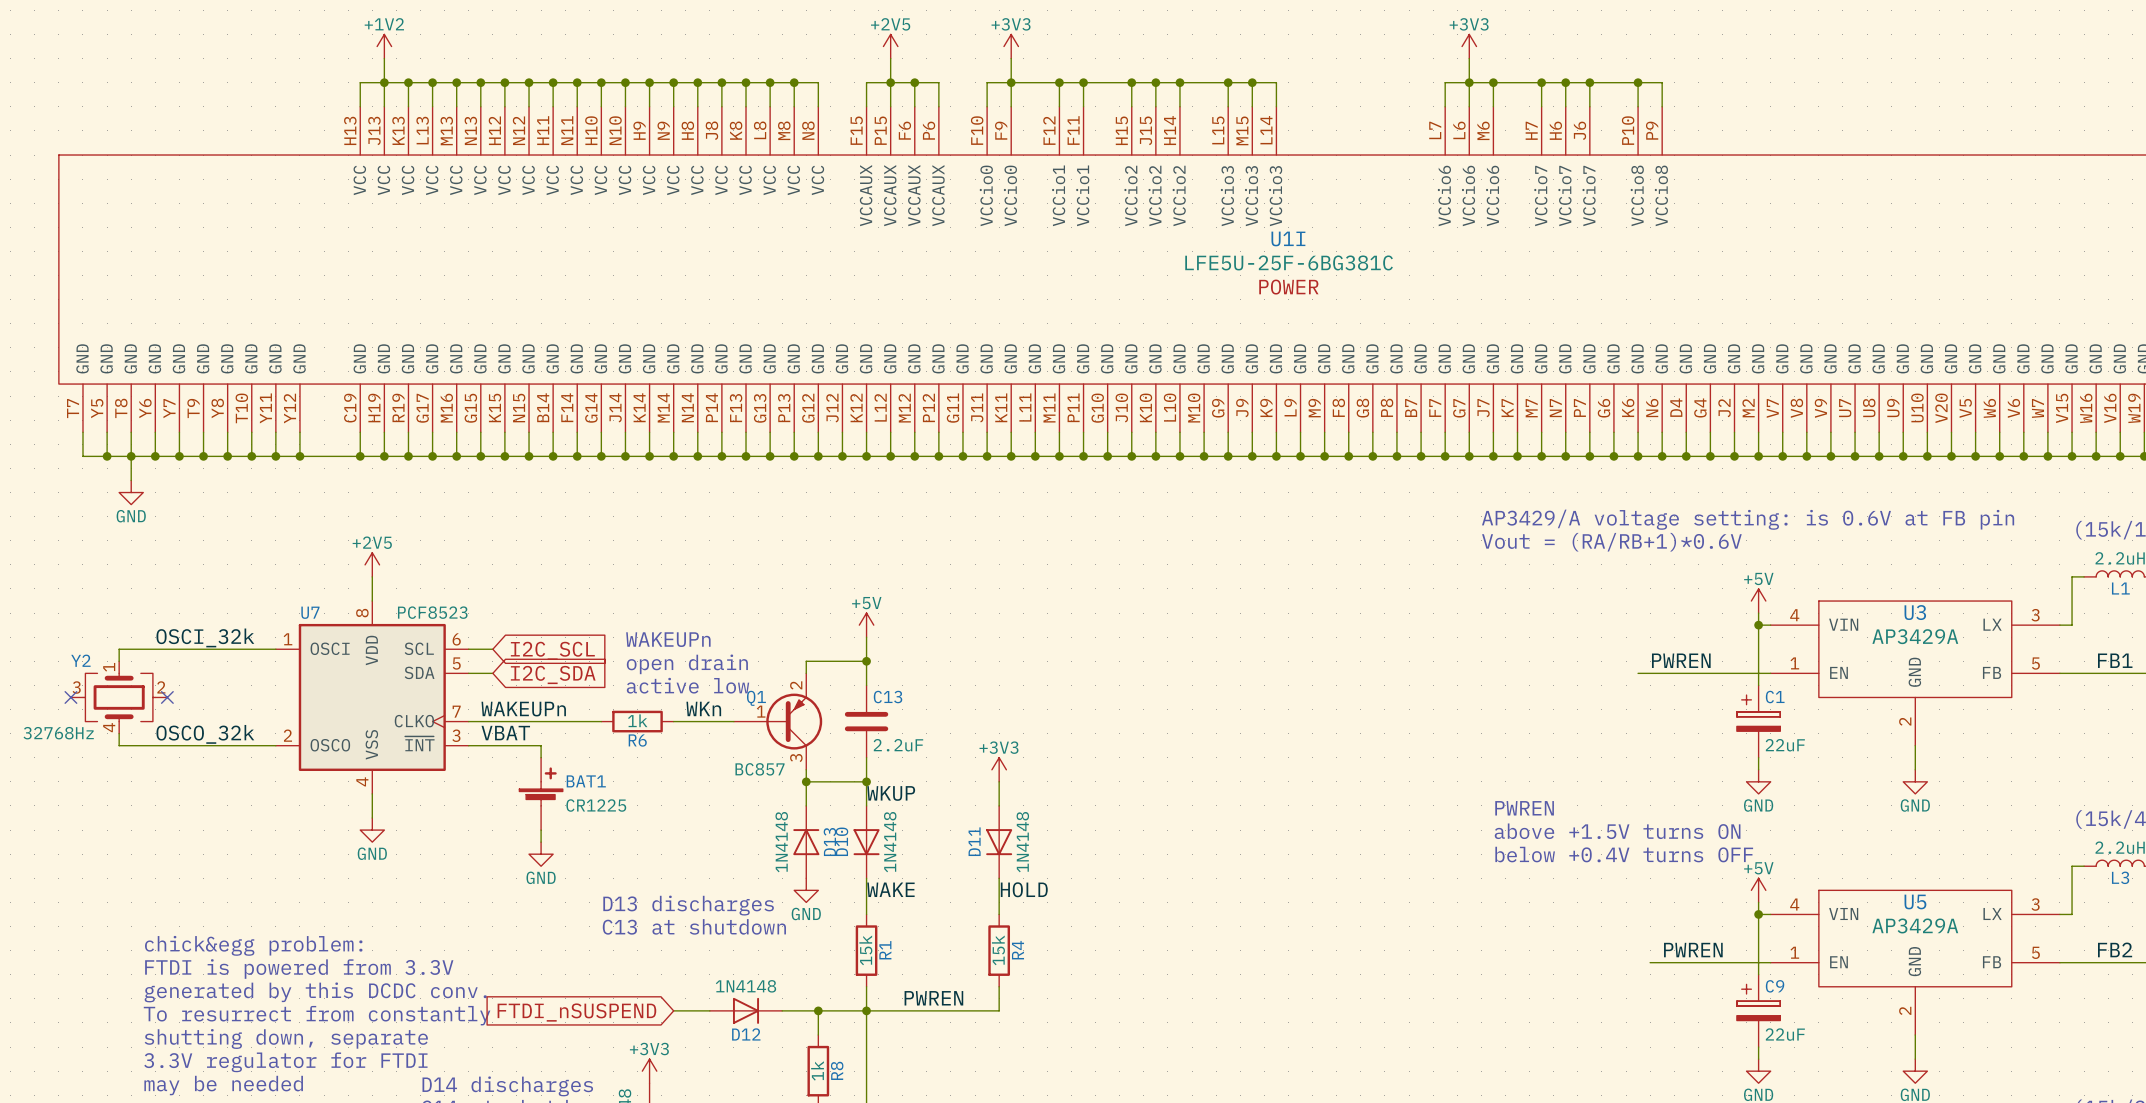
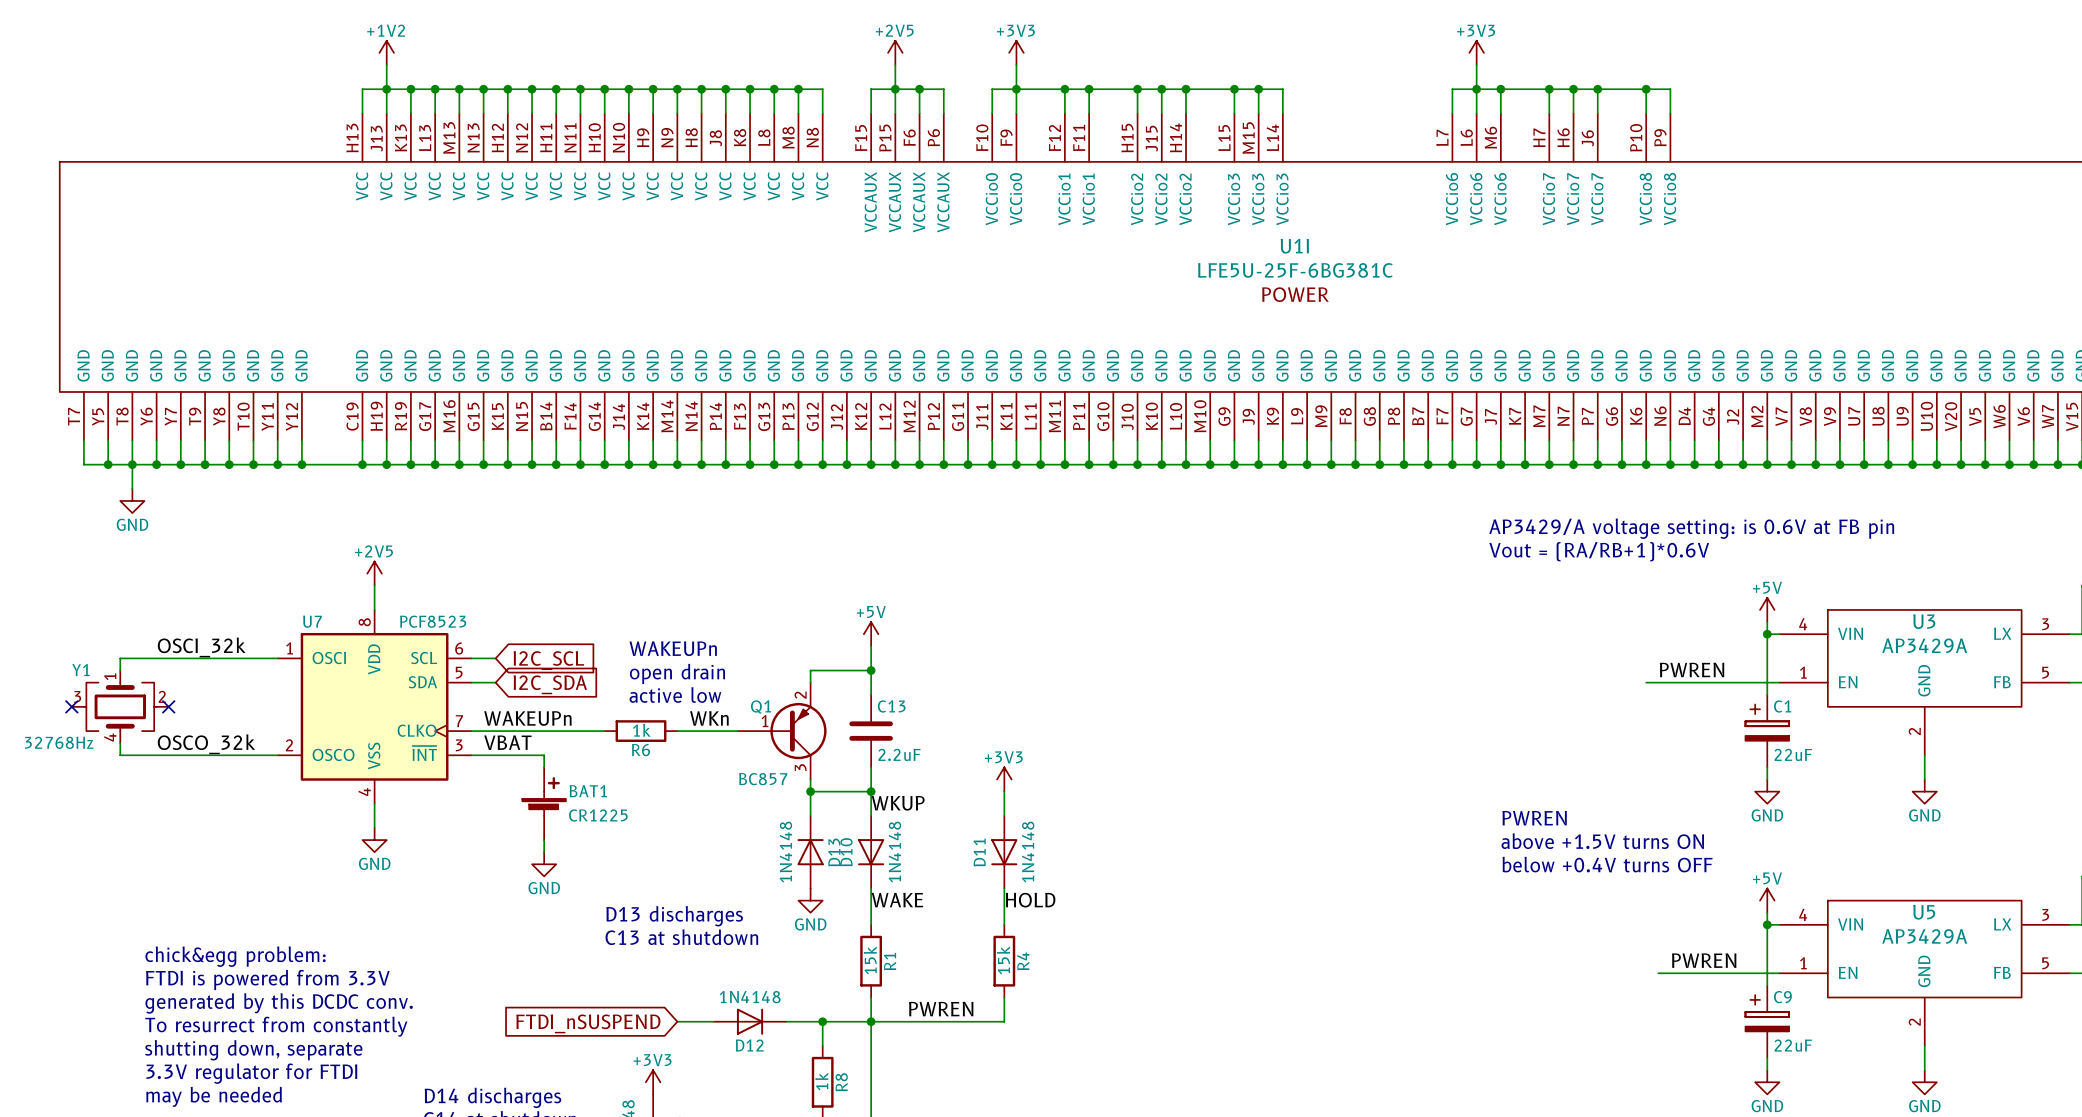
Y2 name: Y2 (80, 660) -> Y1 (81, 670)

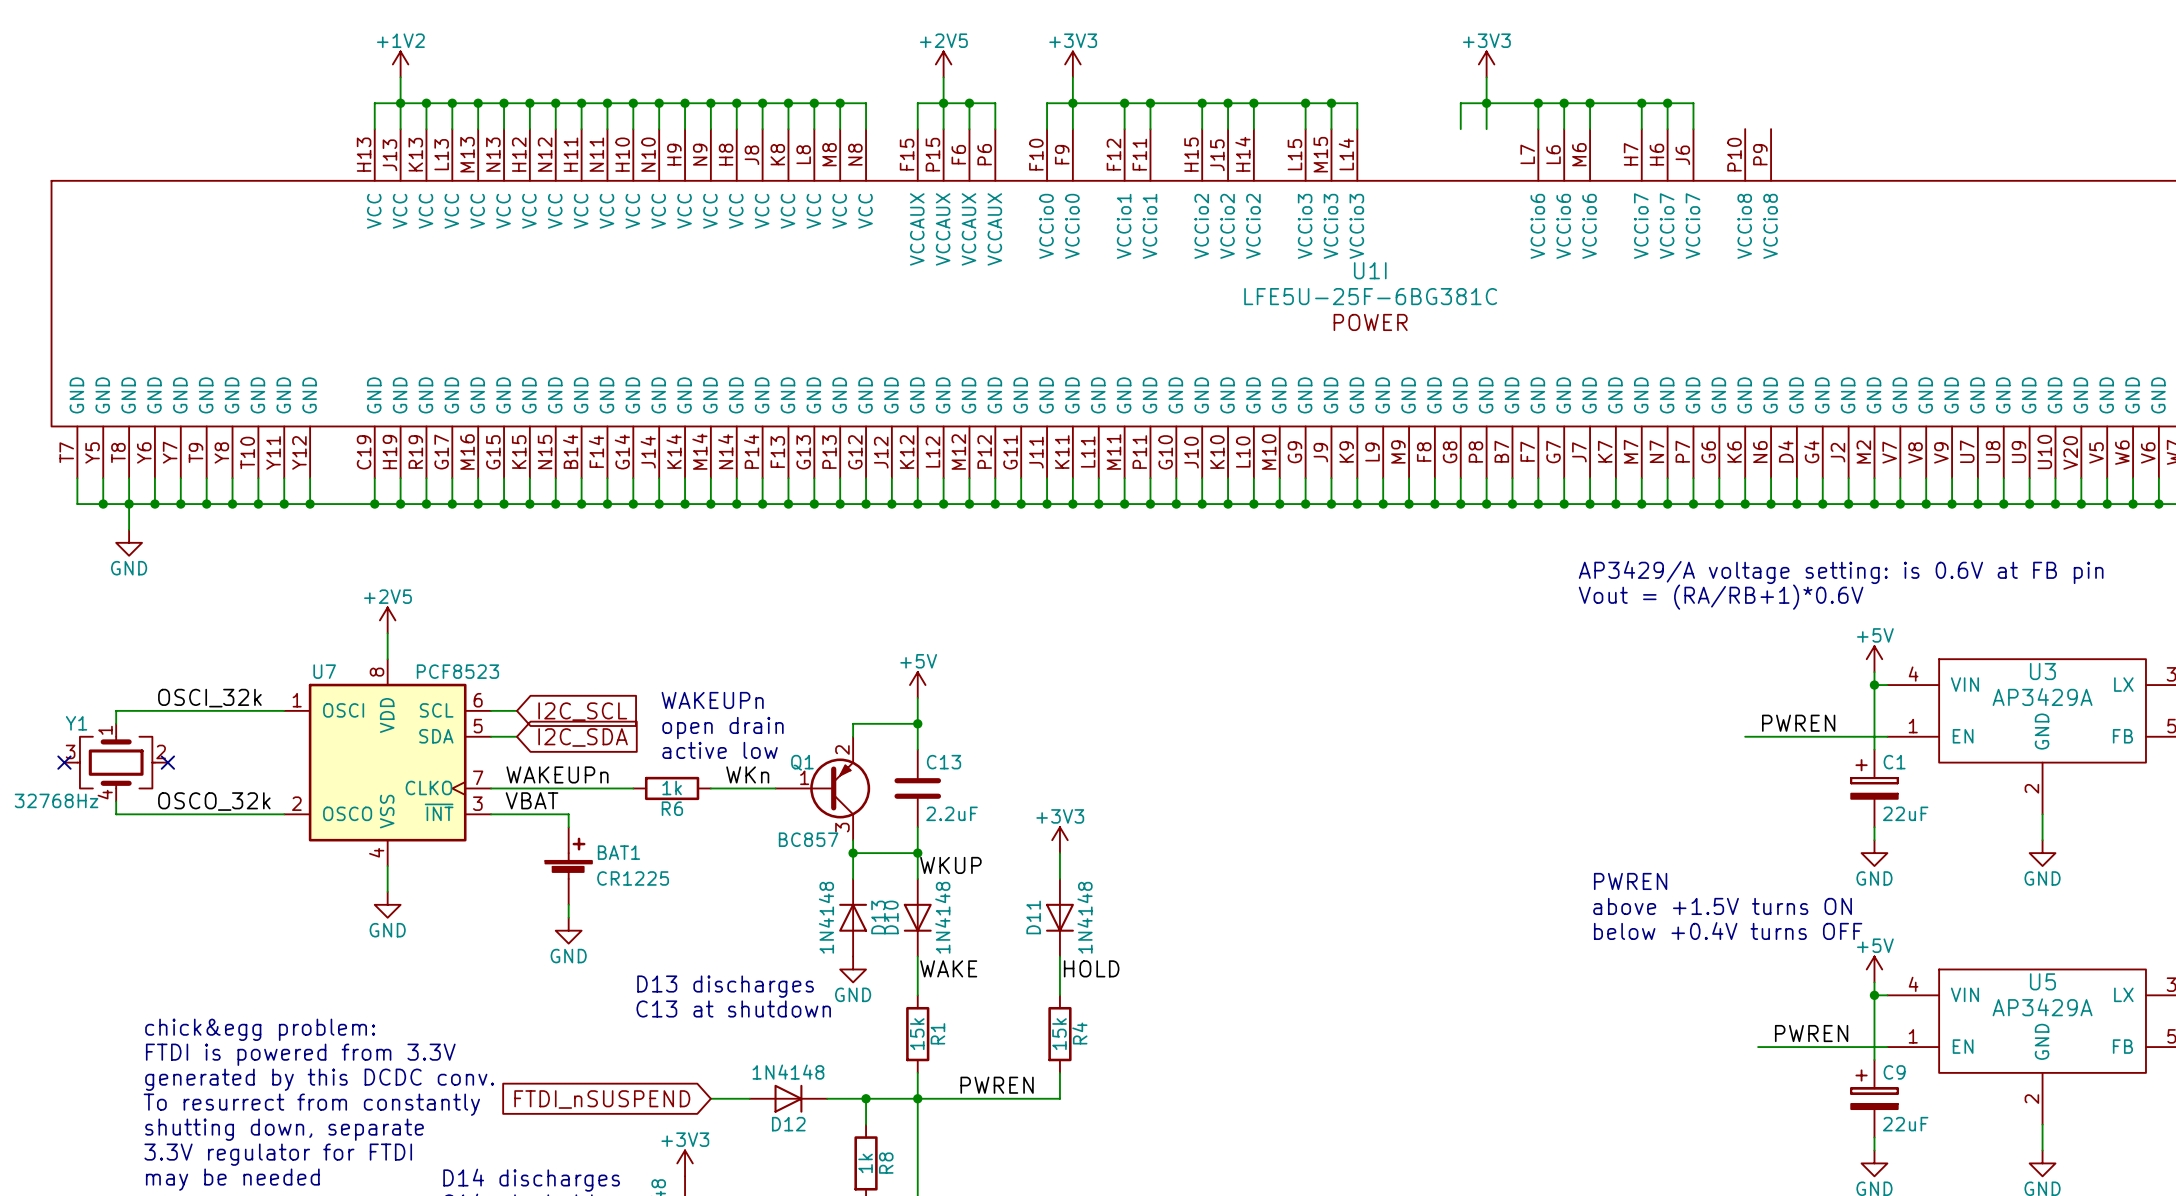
power symbol position: +3V3 (1476, 52) -> +3V3 (1486, 64)
wire: none -> (1486, 77) (1486, 129)
wire: (1476, 65) (1476, 89) -> none
junction: none -> (1486, 103)
wire: none -> (1538, 103) (1460, 103) (1460, 129)
junction: none -> (1538, 103)
wire: (1597, 89) (1670, 89) (1670, 113) -> none
junction: (1597, 89) -> none
wire: (1646, 89) (1646, 113) -> none
junction: (1646, 89) -> none

